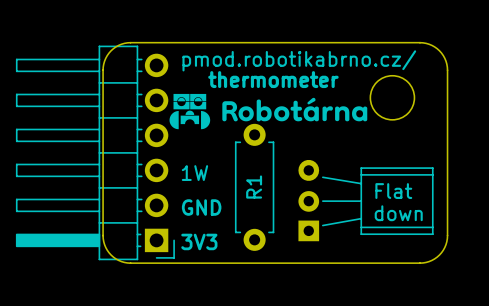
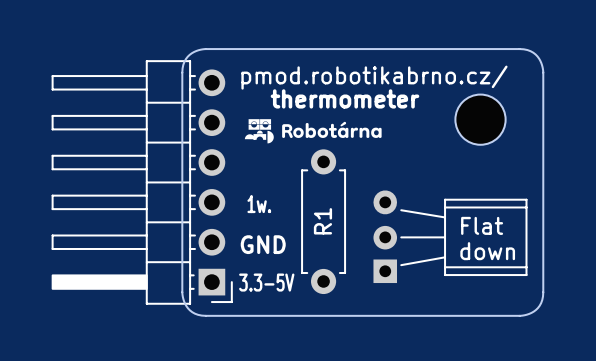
board edge: (103, 70) (103, 235) (103, 238) (107, 250) (118, 260) (130, 263) (419, 263) (434, 258) (444, 247) (447, 235) (447, 67) (441, 53) (431, 45) (419, 42) (127, 42) (115, 46) (109, 53) (104, 61) (103, 64) (103, 67) (103, 70) -> (205, 49) (196, 51) (187, 56) (183, 64) (182, 72) (182, 292) (185, 304) (192, 312) (205, 315) (519, 315) (531, 312) (539, 305) (543, 292) (543, 72) (540, 60) (533, 52) (519, 49) (205, 49)
drawing: [169, 93, 211, 130] -> none
drawing: none -> [248, 119, 382, 144]
drawing: [290, 97, 368, 122] -> none
drawing shape: [256, 99, 272, 122] -> [328, 123, 337, 138]
drawing shape: [222, 101, 238, 122] -> [293, 127, 304, 138]
drawing: [238, 106, 254, 122] -> none
drawing shape: [274, 106, 290, 122] -> [350, 127, 359, 138]
text: 1W (194, 173) -> 1w. (259, 204)
text: 3V3 (199, 241) -> 3.3-5V (266, 282)

